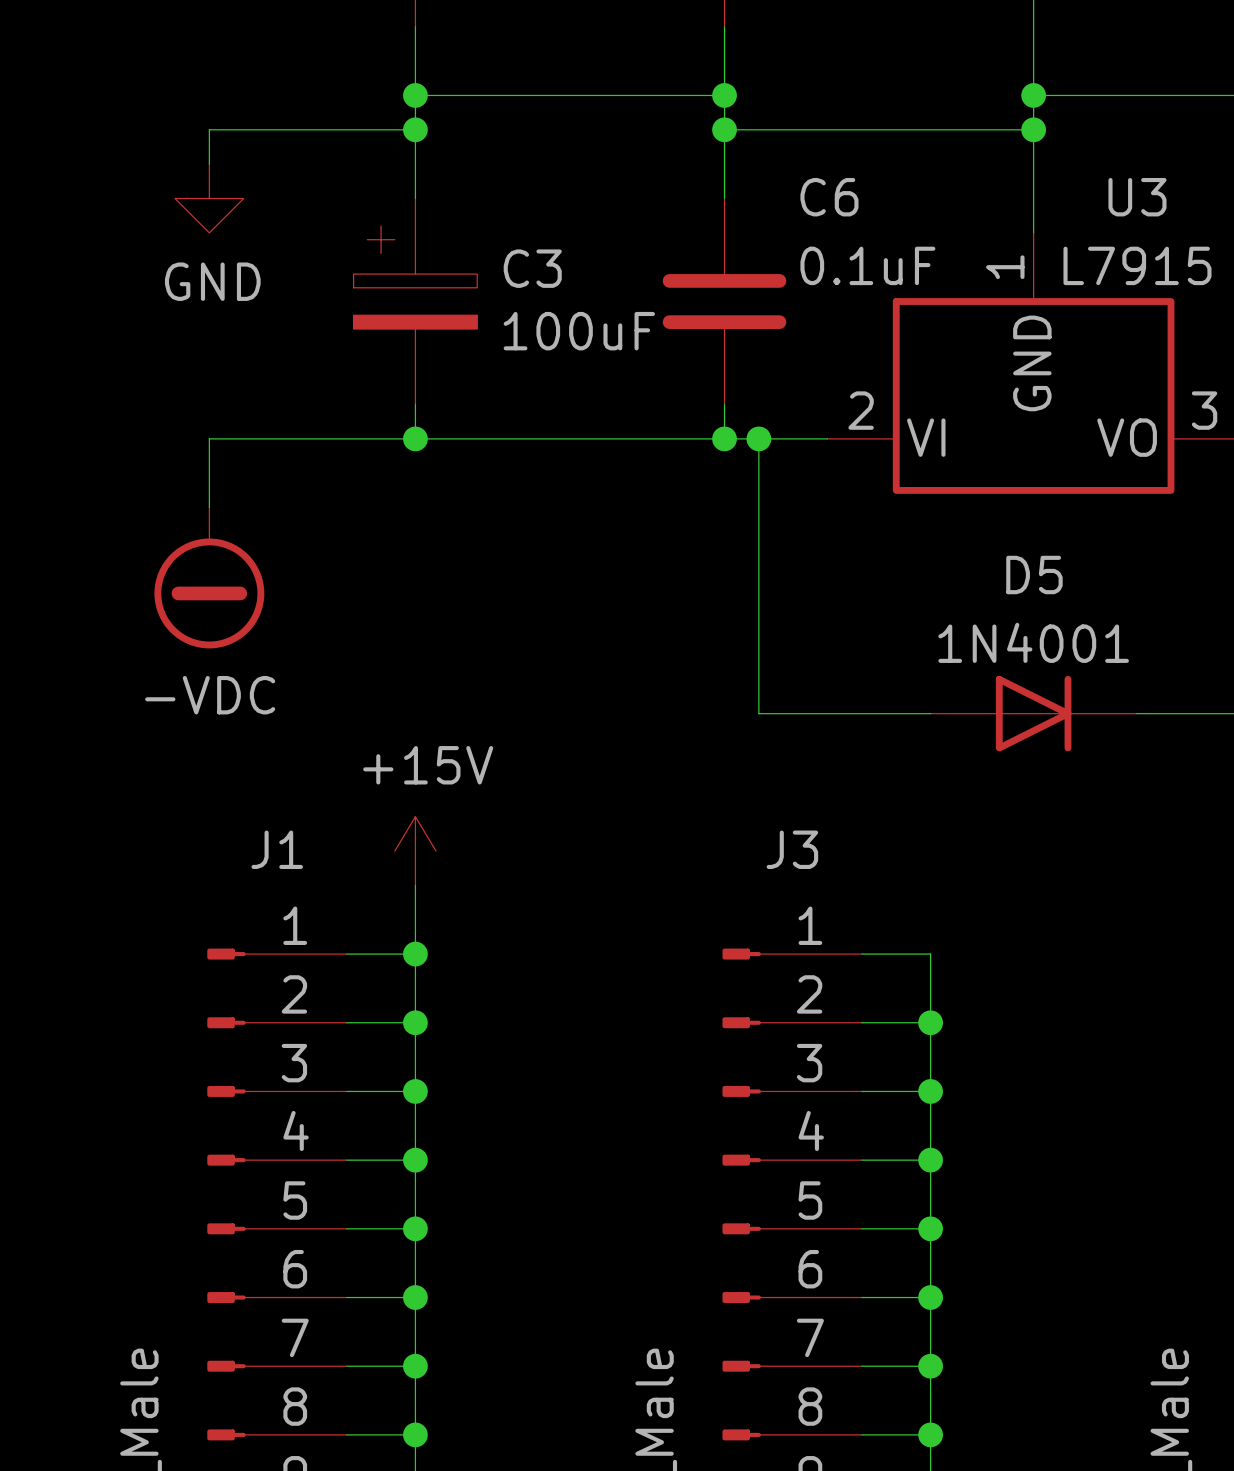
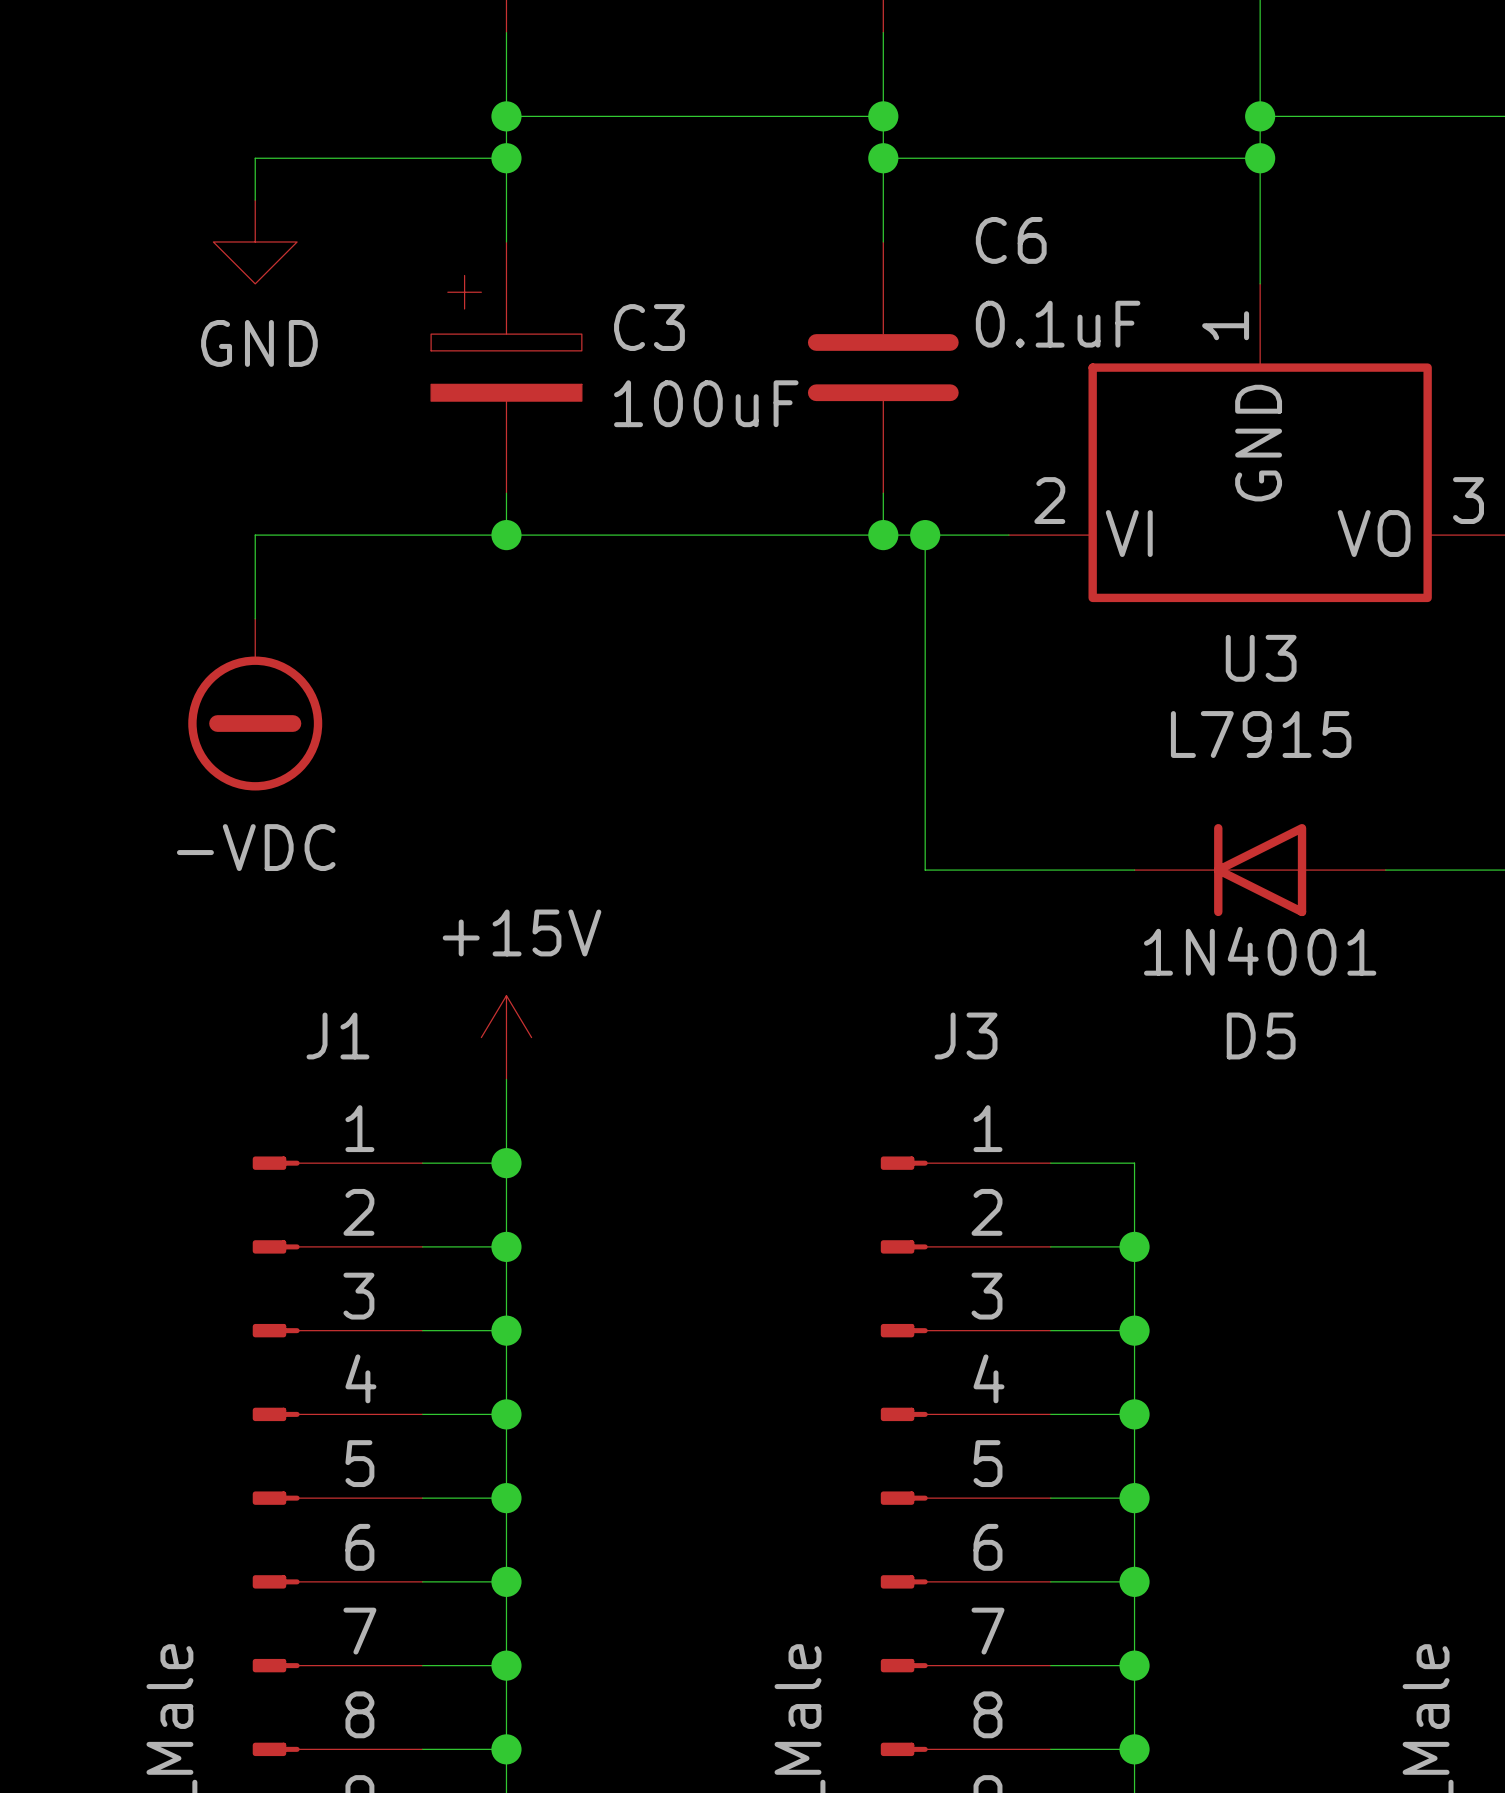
U3 name position: U3 (1137, 197) -> U3 (1261, 658)
U3 value position: L7915 (1137, 265) -> L7915 (1261, 734)
D5 rotation: 0° (1033, 713) -> 180° (1260, 870)

